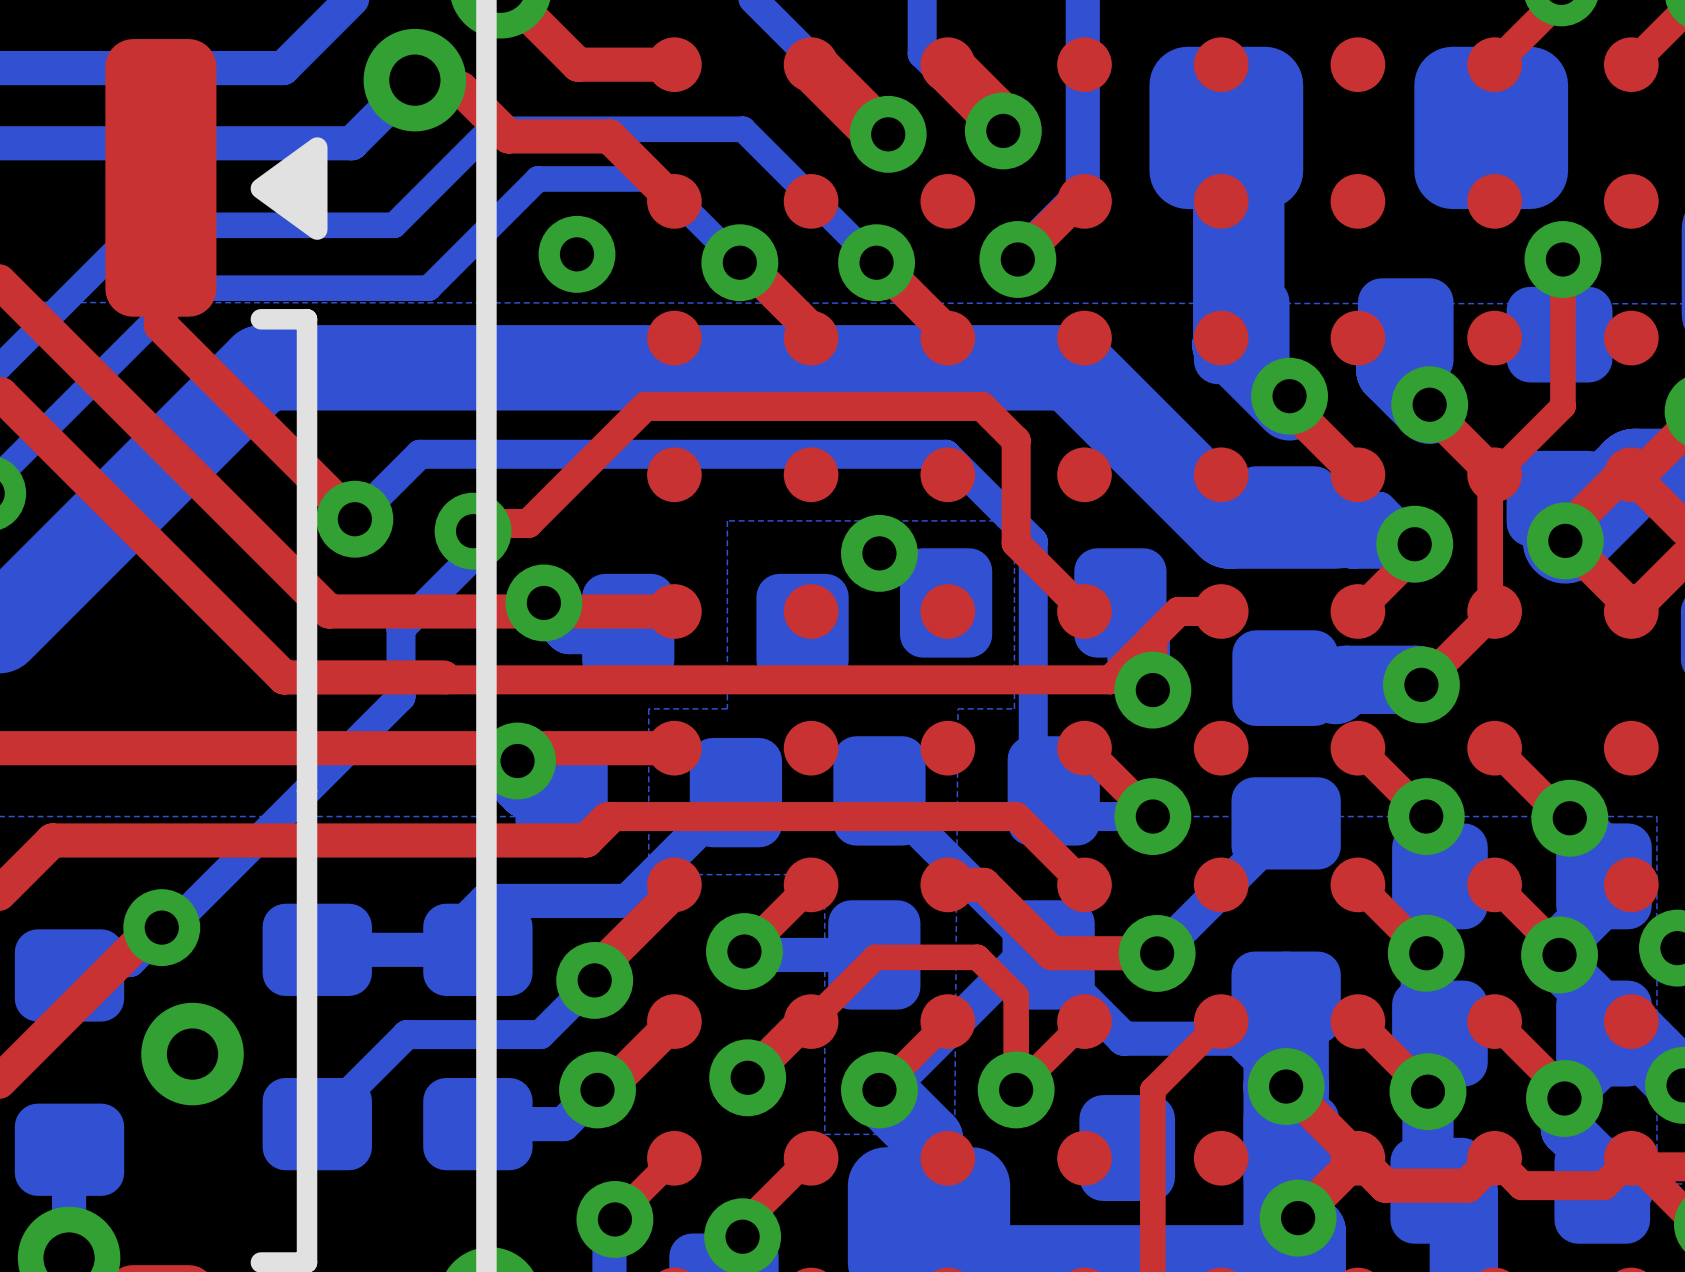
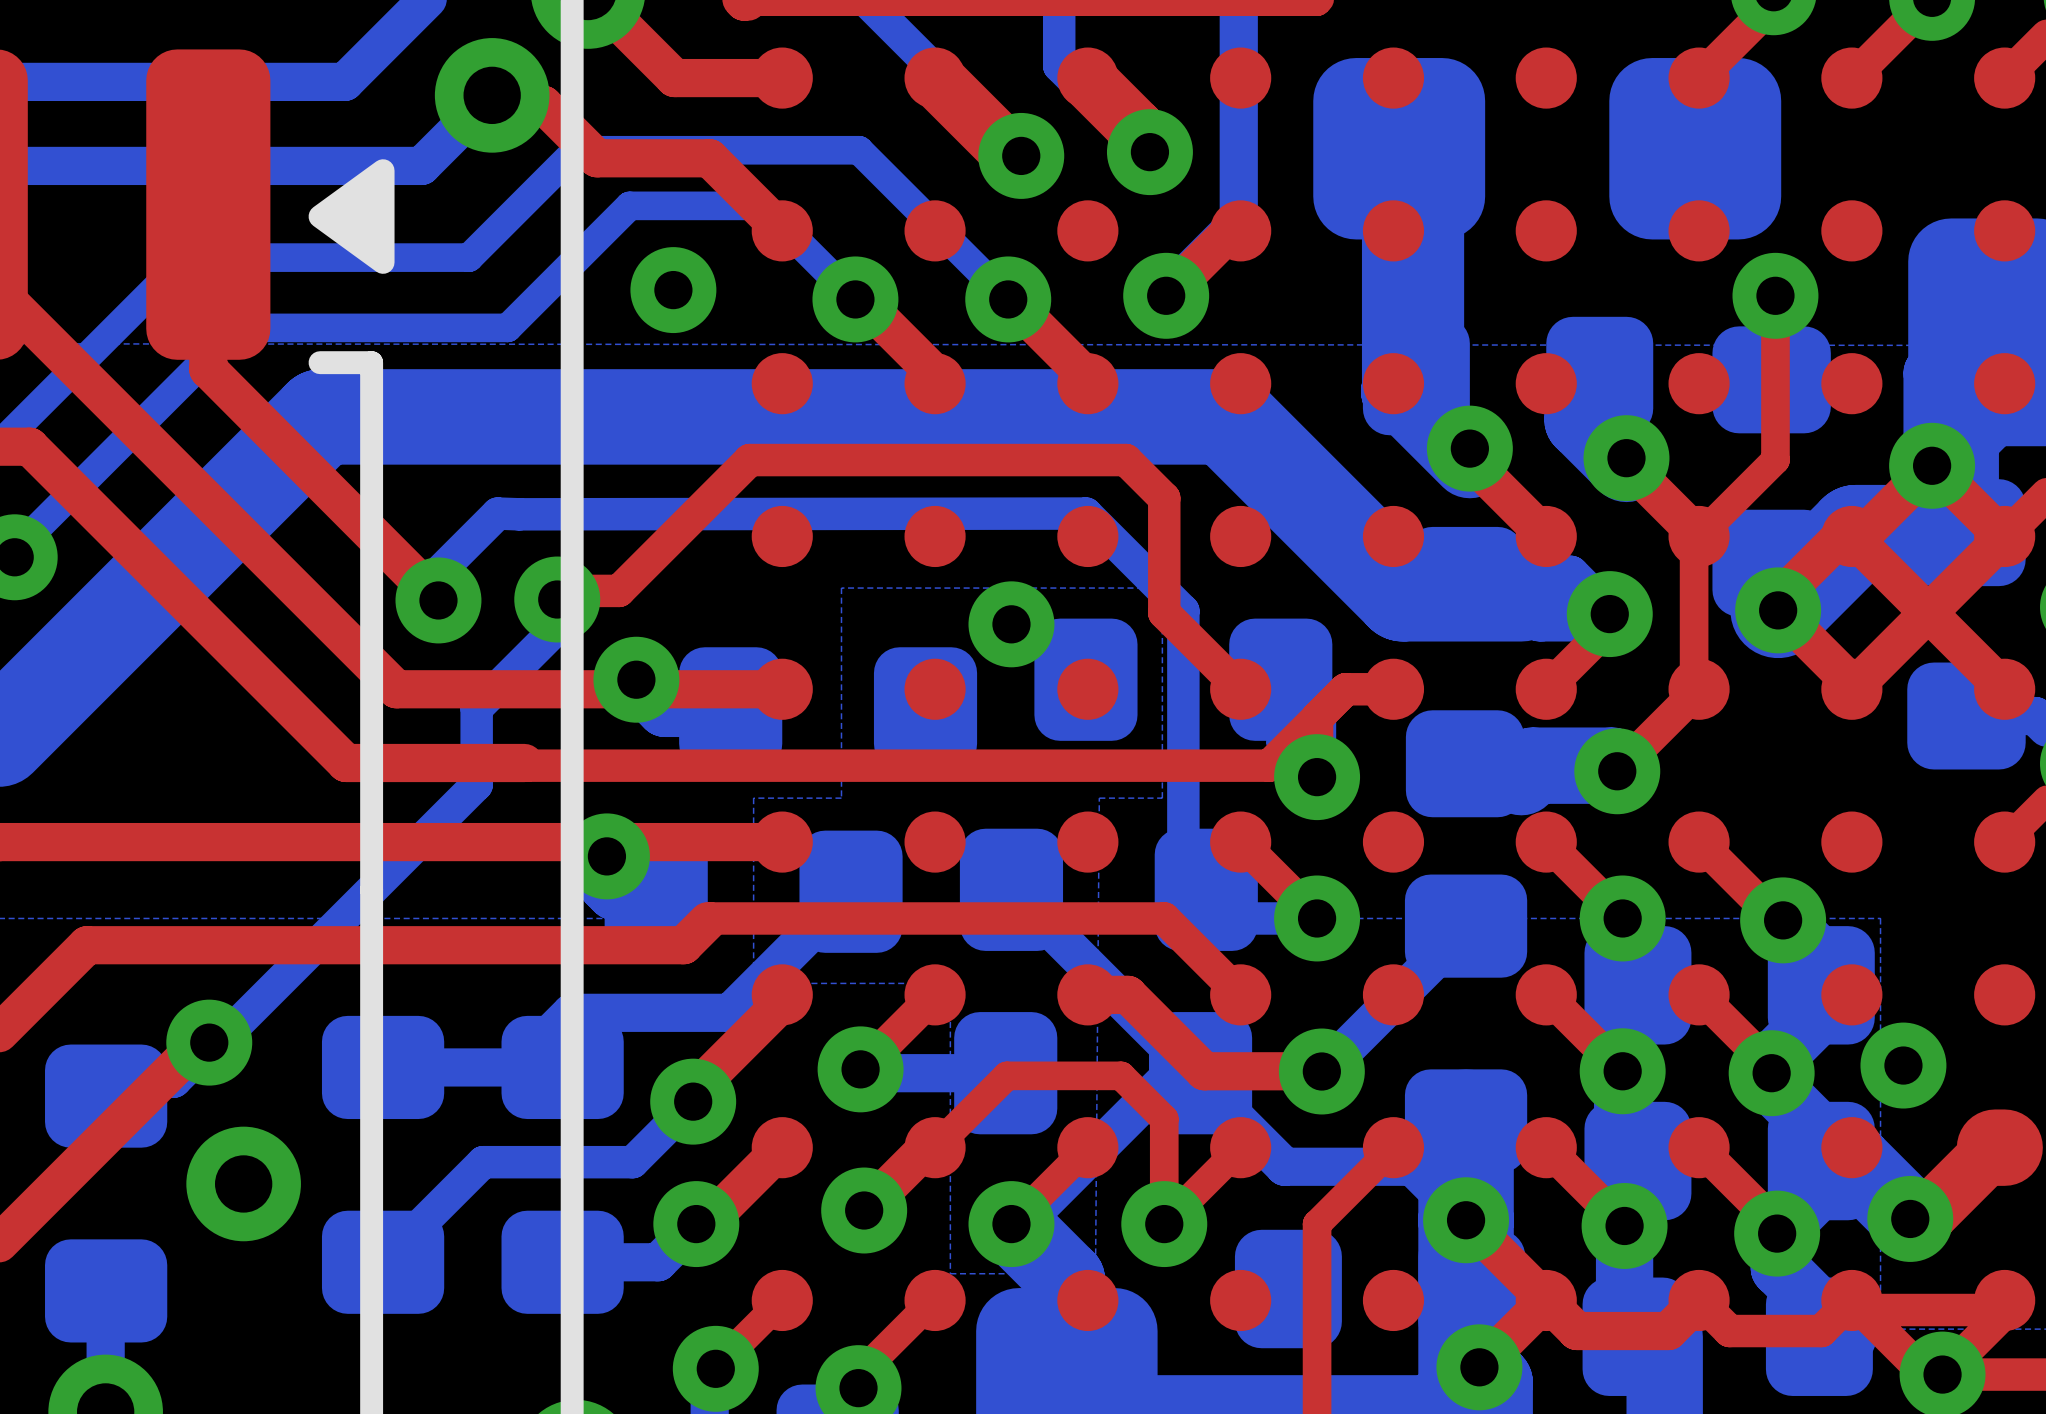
top track: (160, 325) (354, 519) -> (208, 369) (438, 600)
via position: (354, 519) -> (438, 600)

